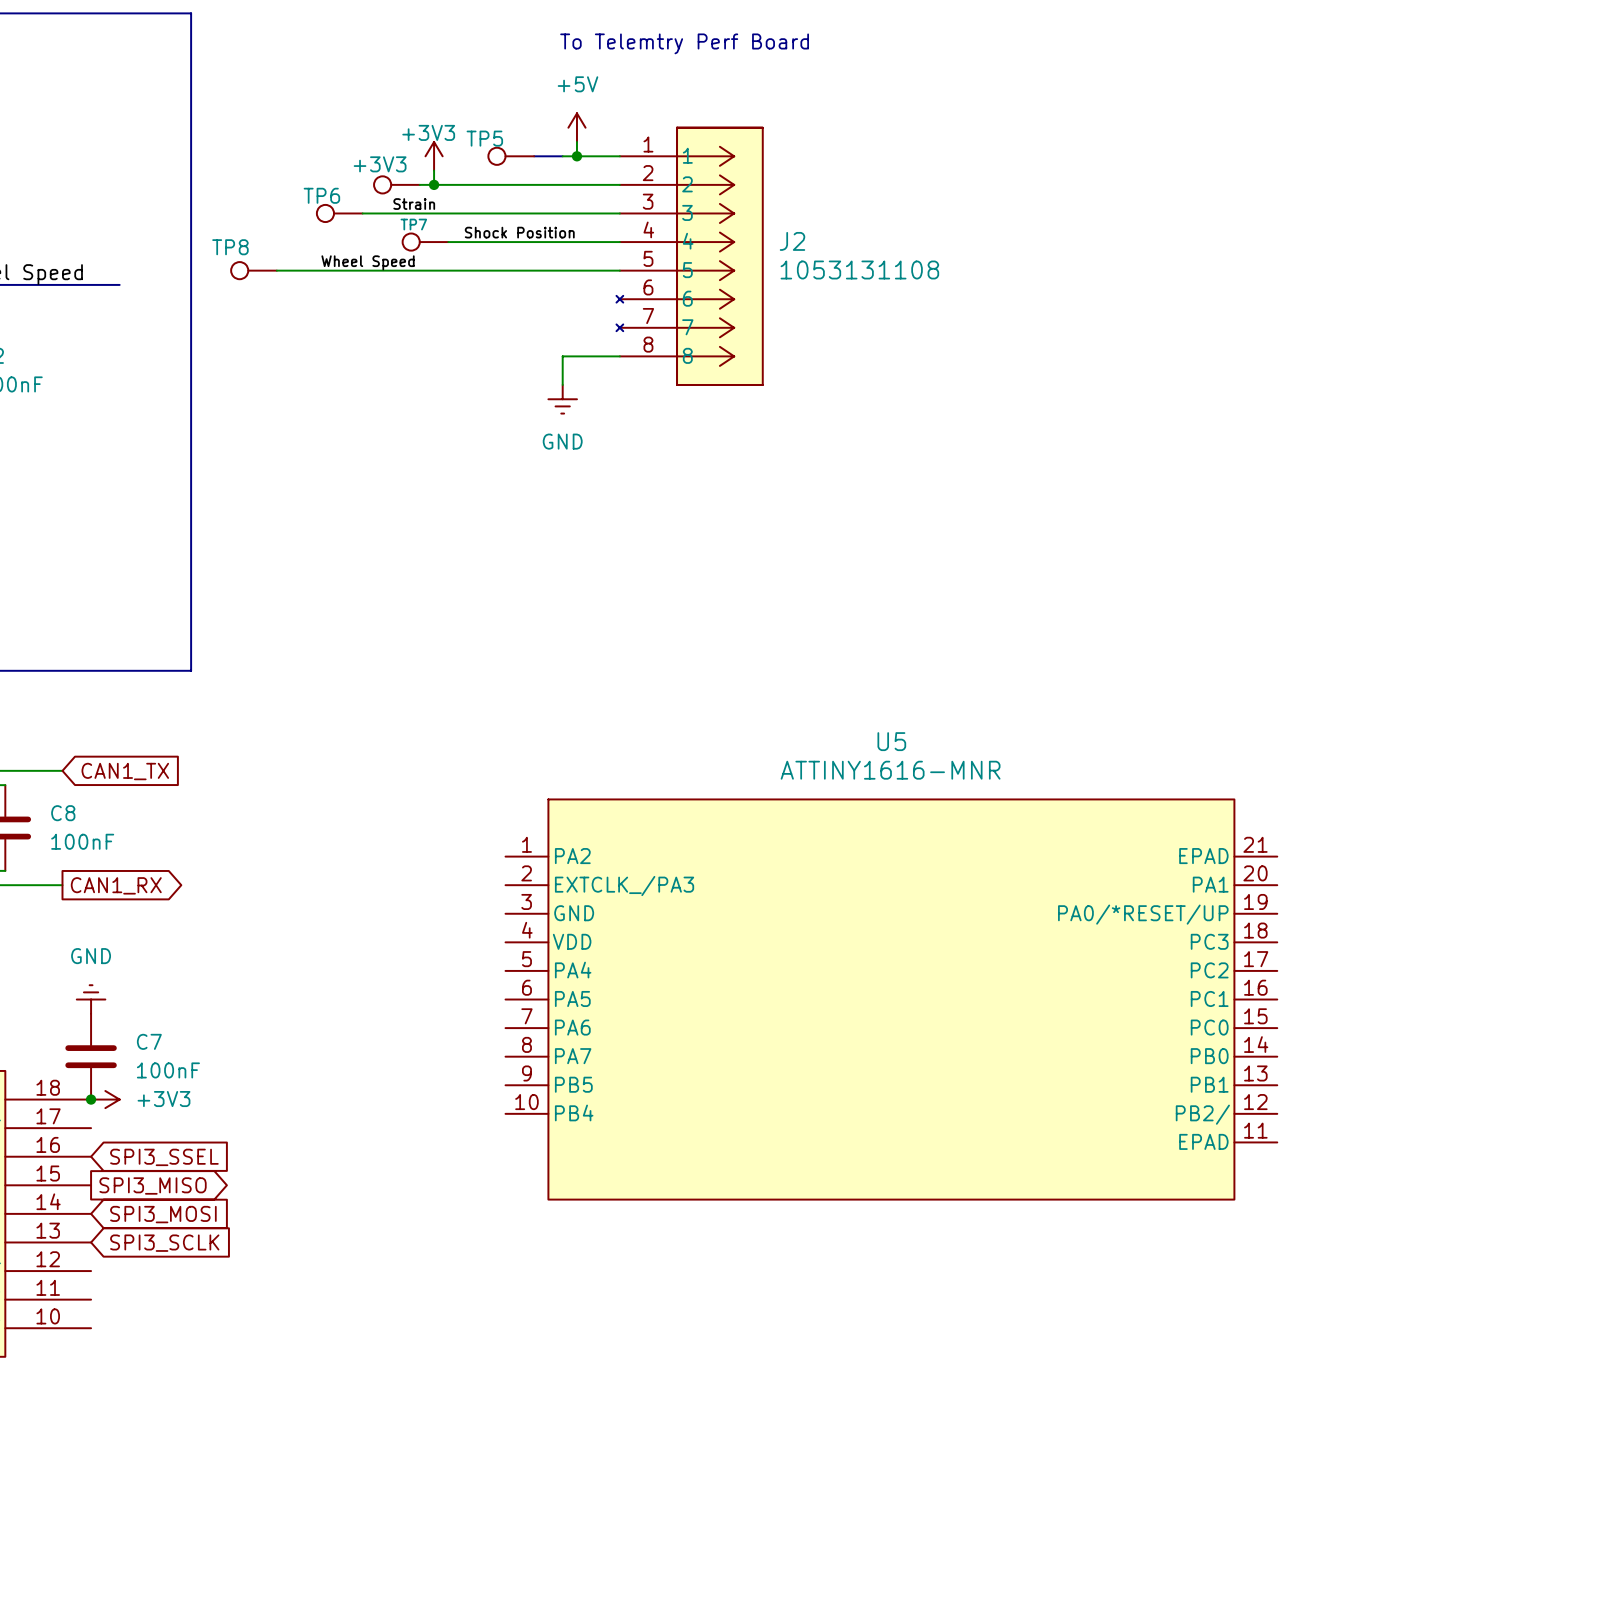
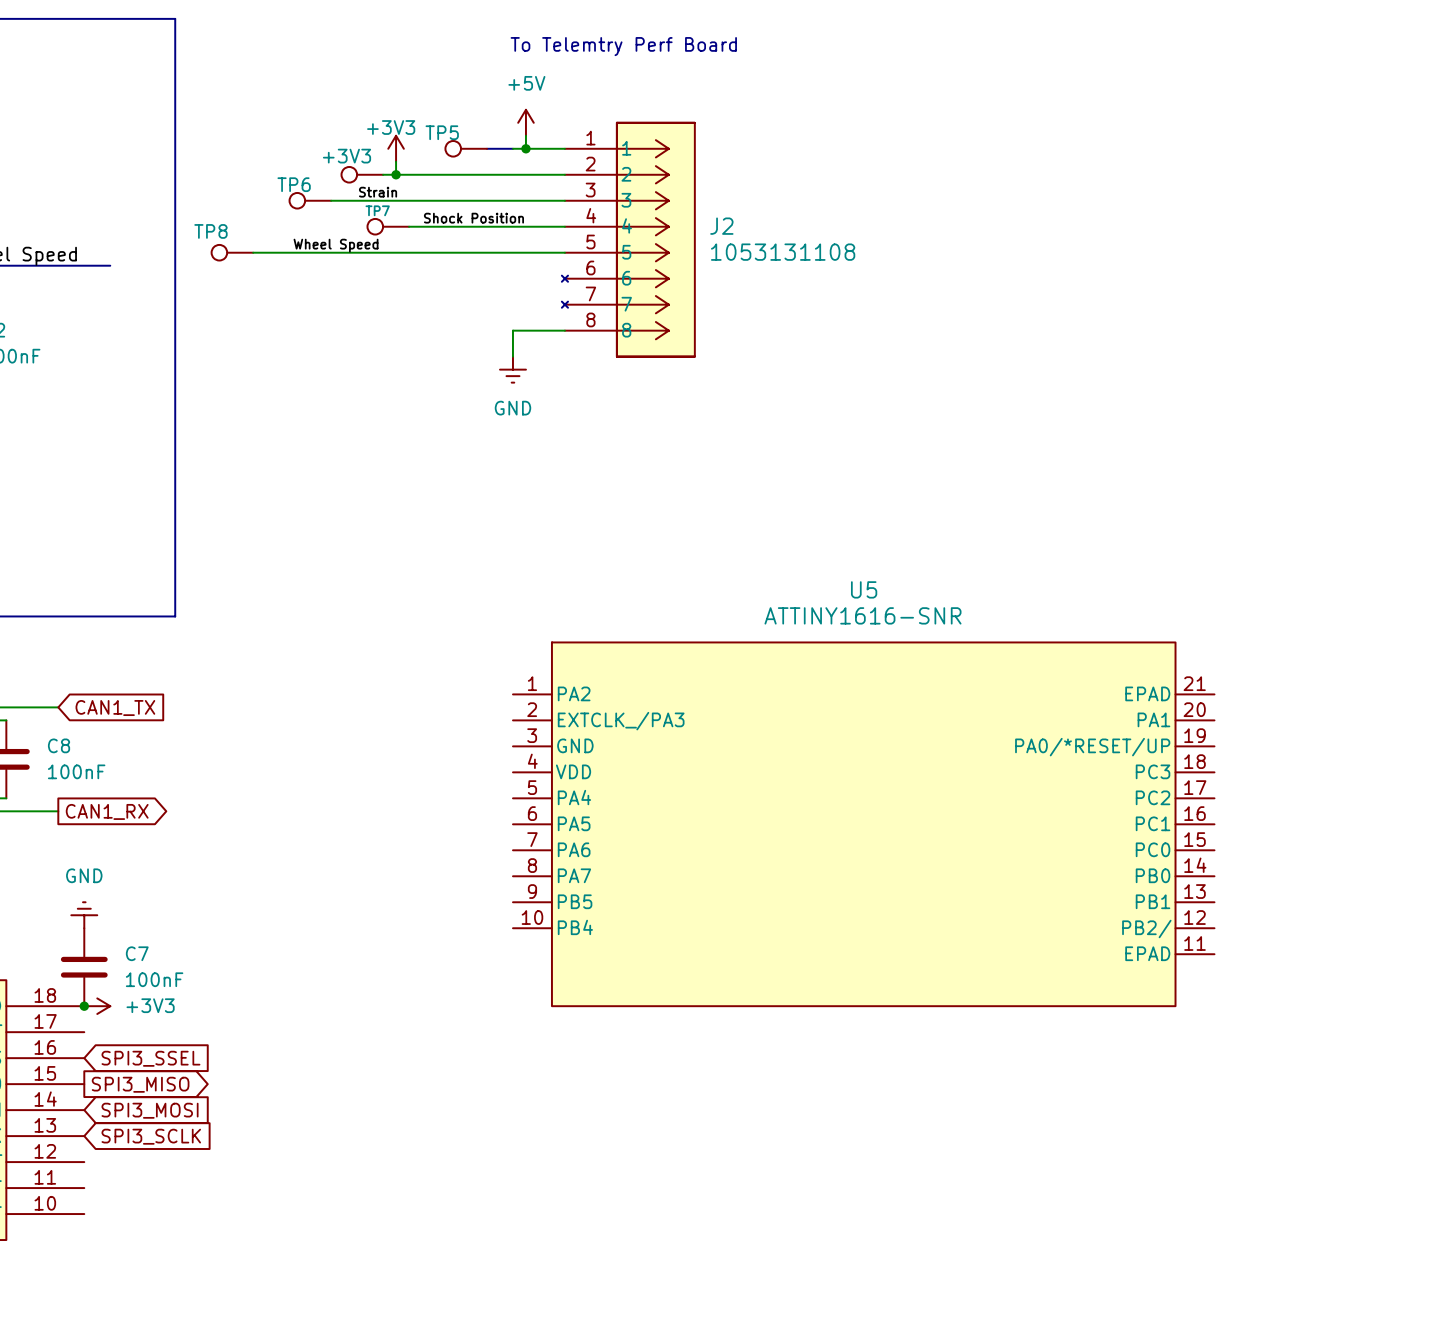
U5 value: ATTINY1616-MNR (890, 770) -> ATTINY1616-SNR (862, 615)
U5 position: (891, 999) -> (863, 824)

